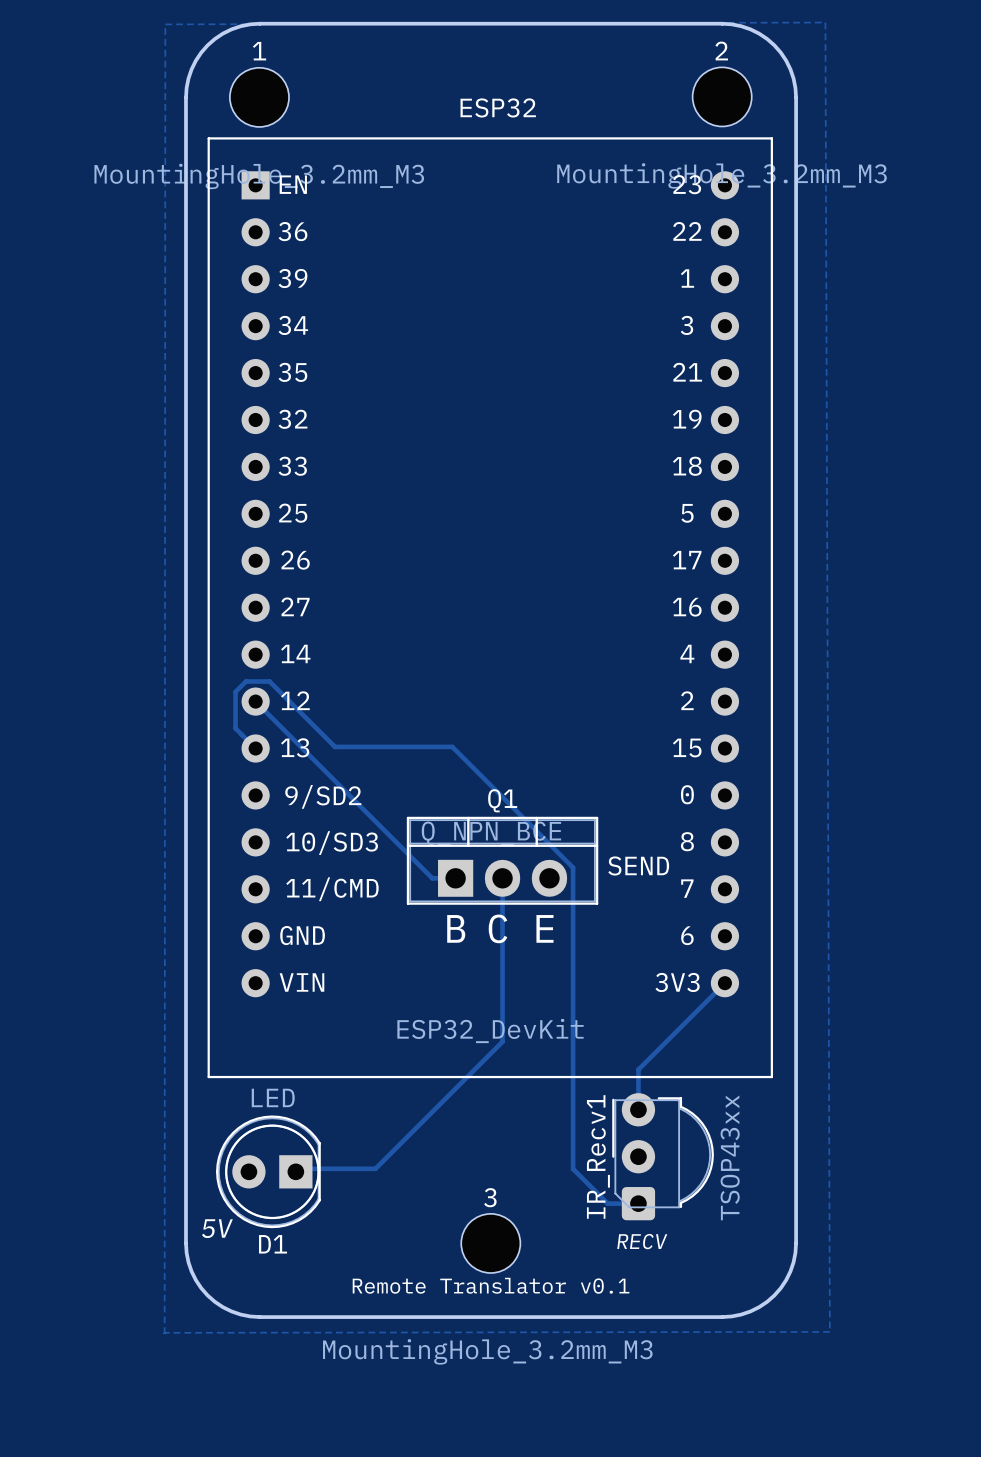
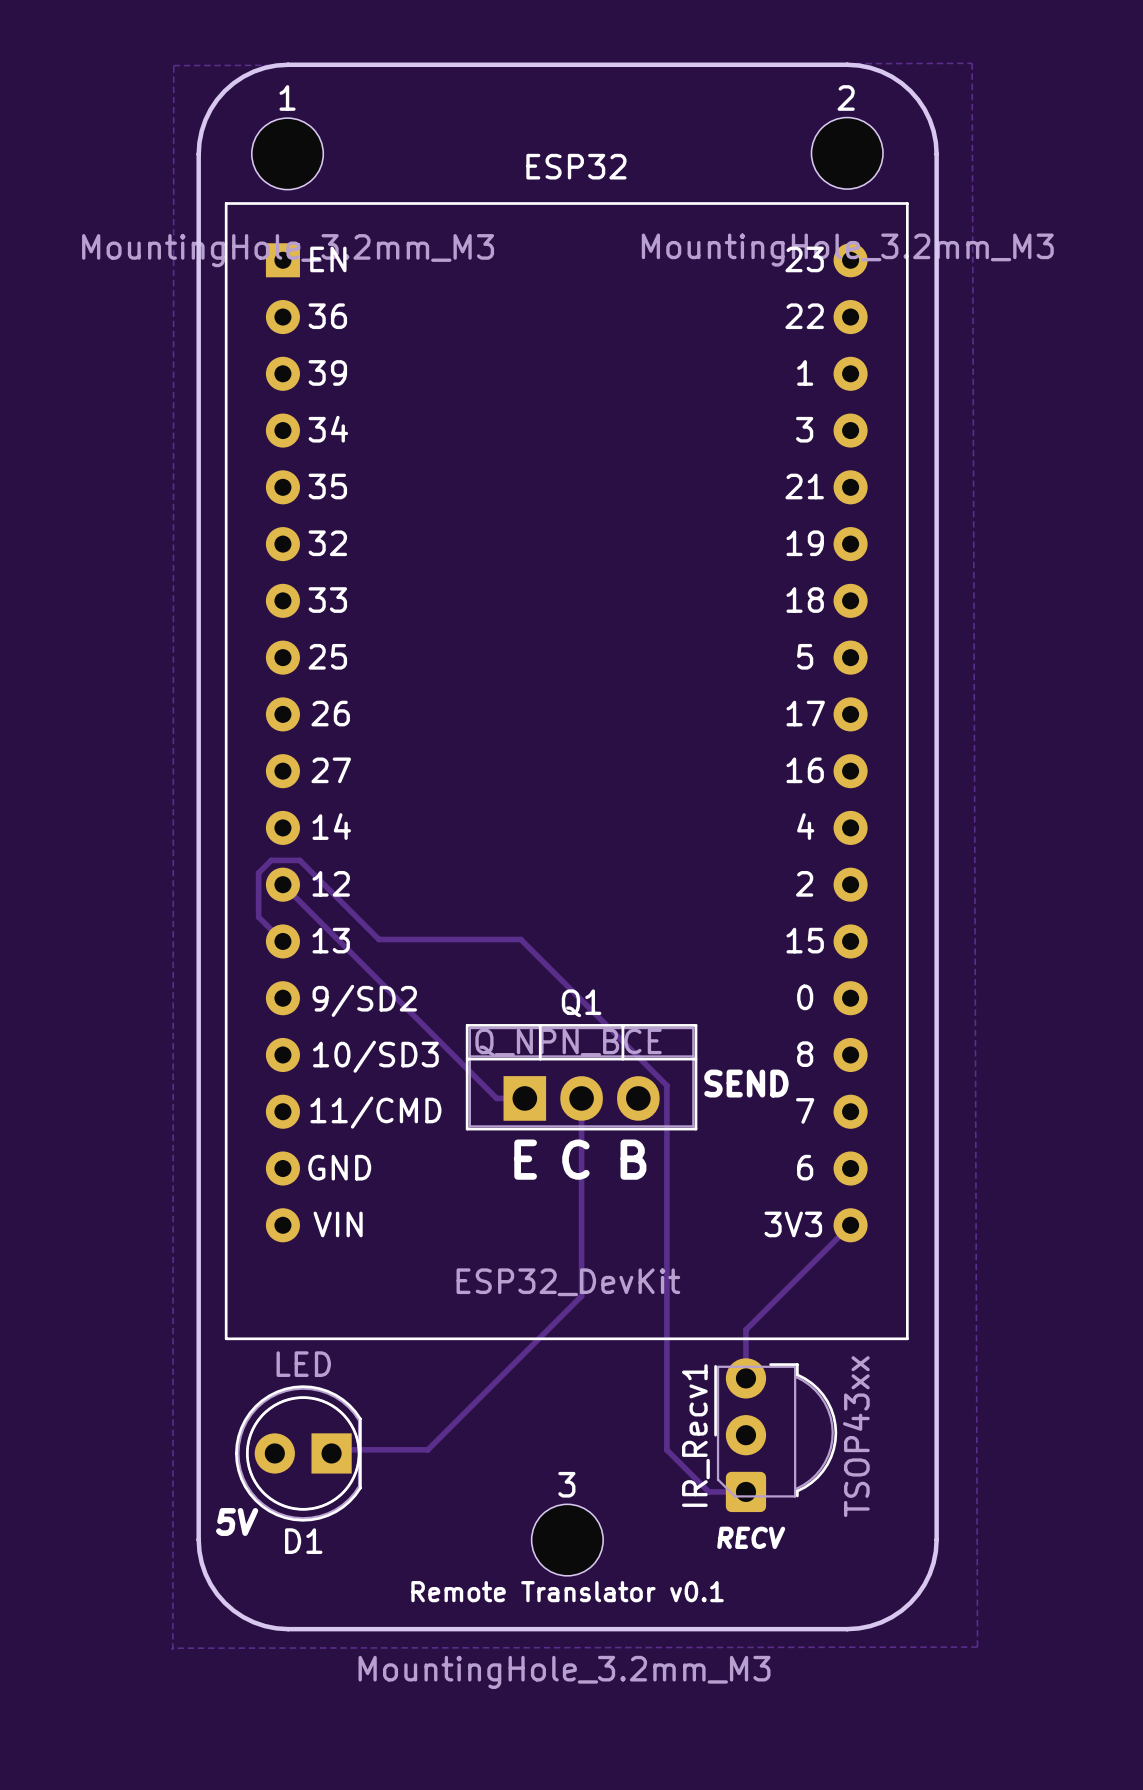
text: B (456, 928) -> E (525, 1159)
text: E (544, 928) -> B (633, 1159)

